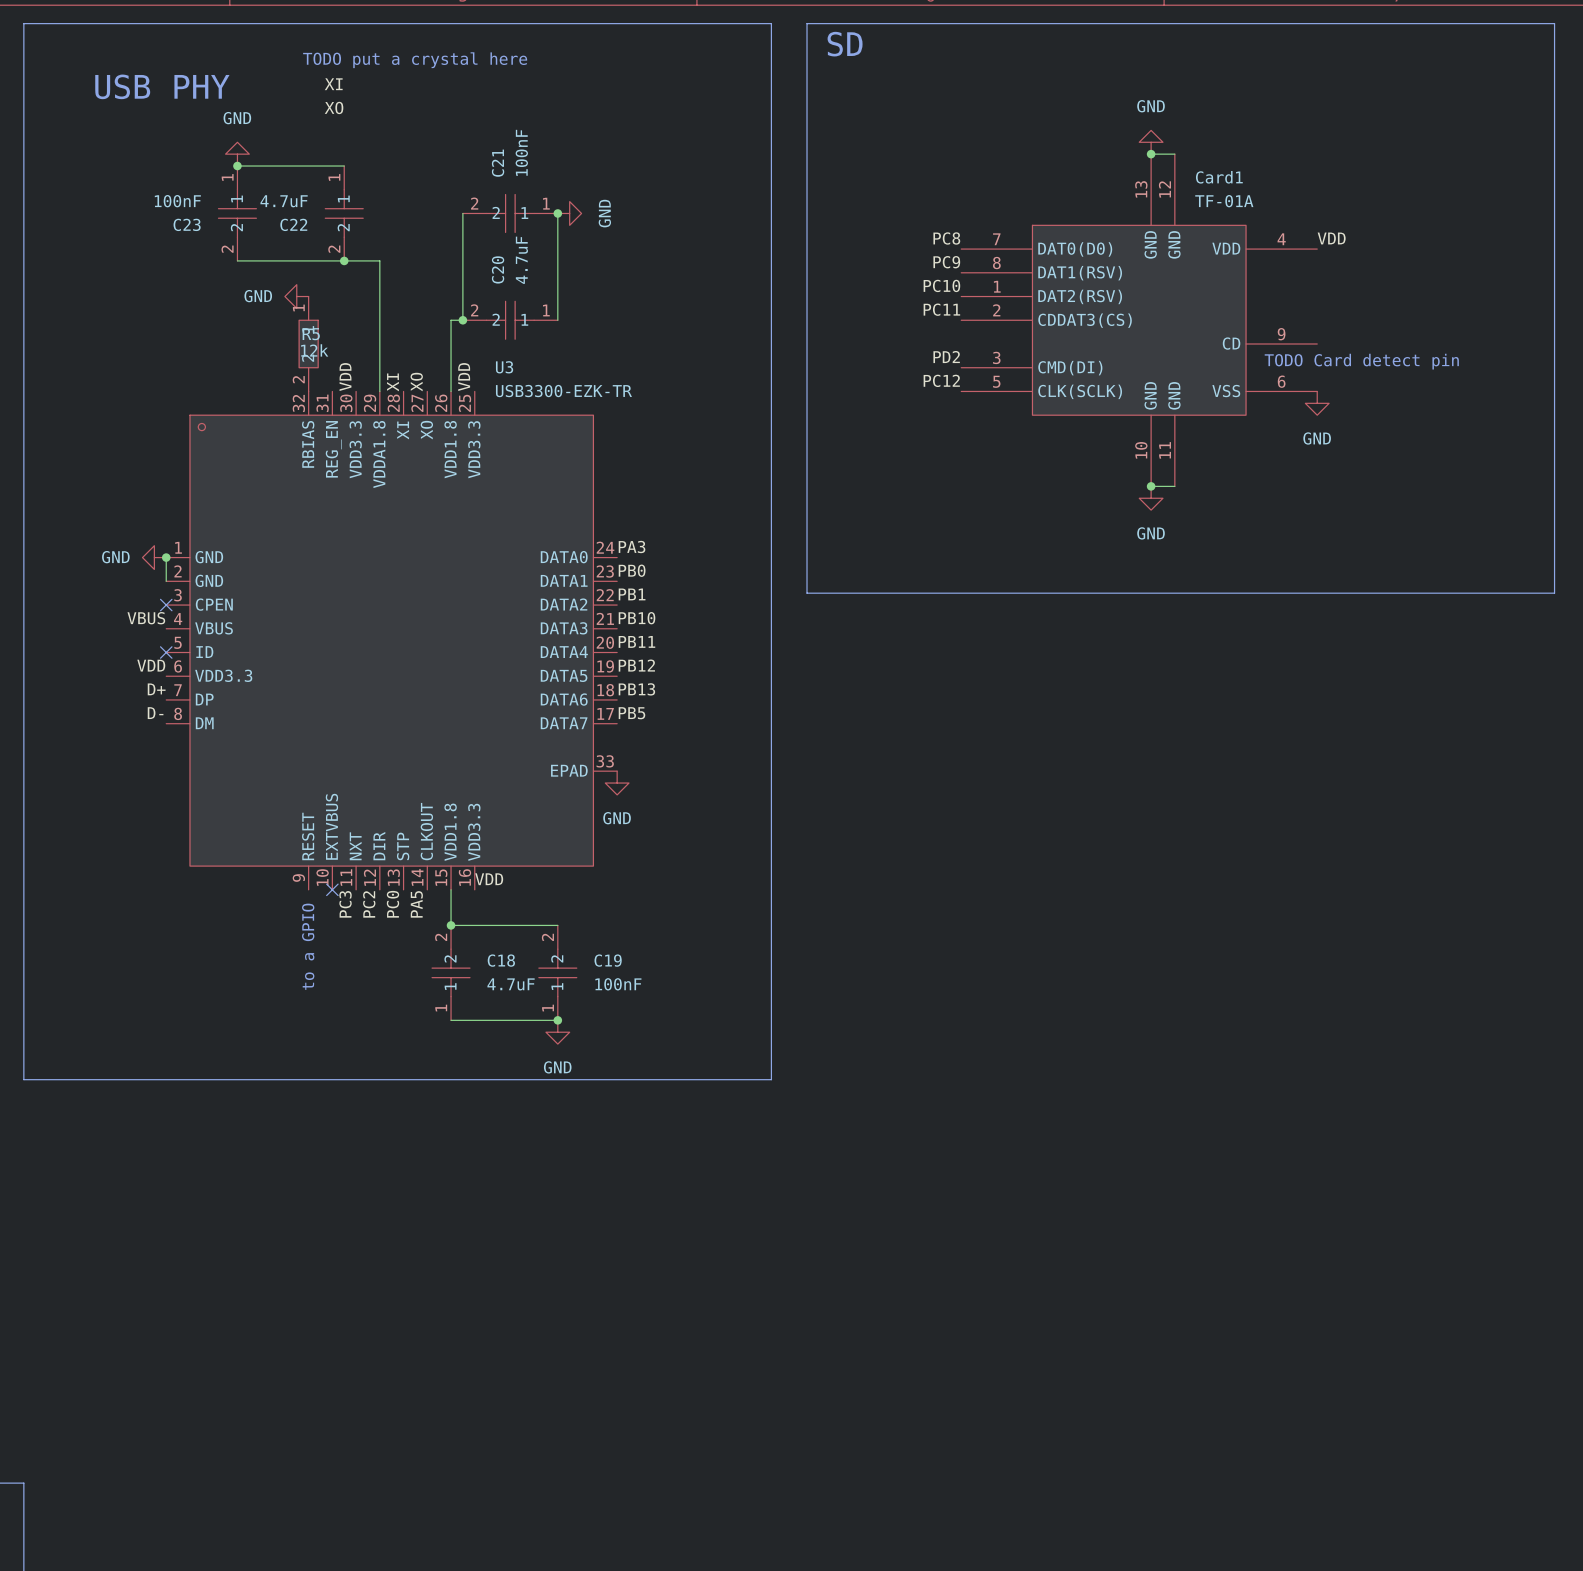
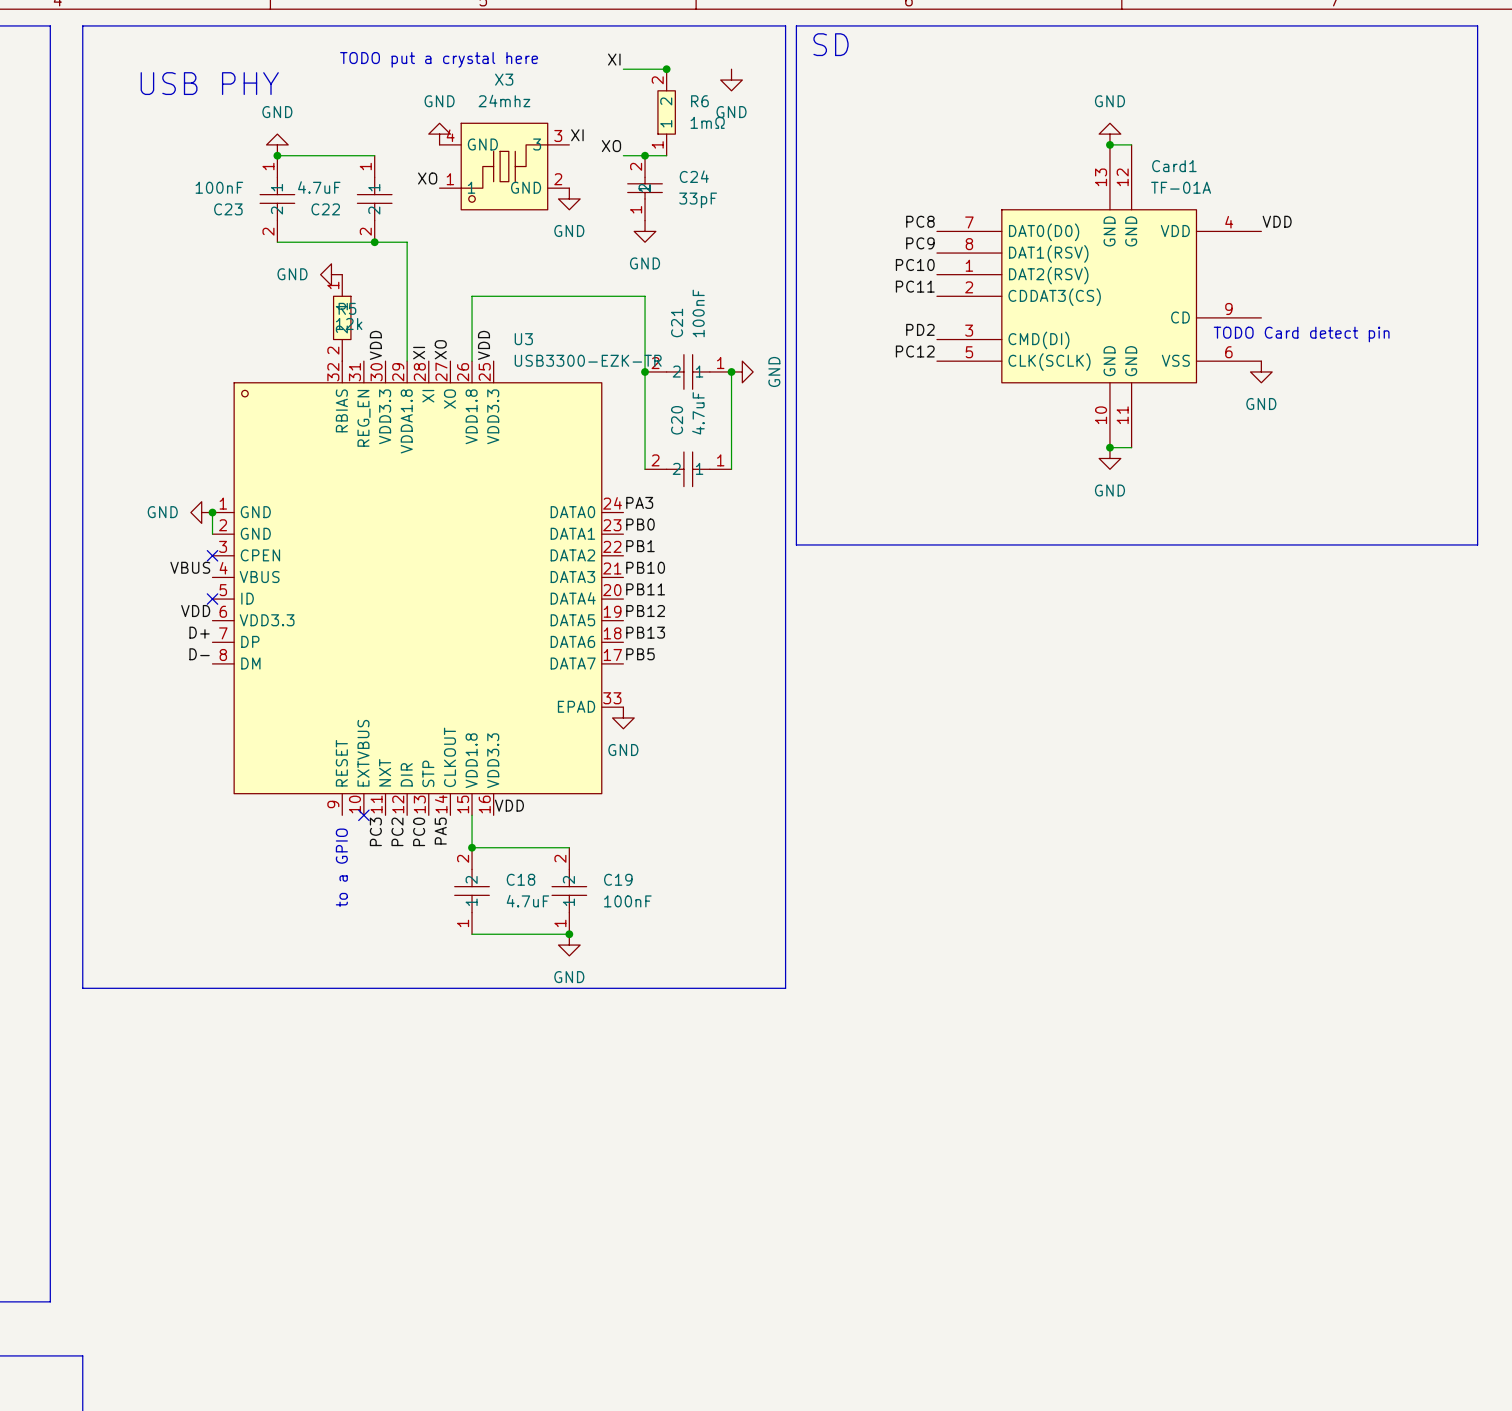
line: (771, 23) (771, 1079) -> (763, 25) (785, 25) (785, 988) (763, 988)
label: none -> XI (614, 59)
wire: none -> (623, 69) (666, 69)
junction: none -> (666, 69)
power symbol: none -> GND (731, 80)
label: XI (333, 84) -> none
label position: XO (334, 107) -> XO (427, 178)
R6: none -> 1mΩ (666, 112)
power symbol: none -> GND (439, 134)
label: none -> XI (577, 135)
label: none -> XO (611, 146)
wire: none -> (623, 155) (666, 155)
junction: none -> (645, 155)
X3: none -> 24mhz (504, 166)
C24: none -> 33pF (645, 188)
wire: (462, 213) (462, 320) -> (645, 469) (645, 296) (482, 296)
C21 position: (510, 213) -> (688, 371)
wire: (557, 213) (557, 320) -> none
junction: (557, 213) -> none
power symbol rotation: 0° (569, 213) -> 90° clockwise (569, 198)
power symbol: none -> GND (645, 231)
junction: (462, 320) -> none
C20 position: (510, 320) -> (688, 469)
junction: none -> (645, 371)
wire: none -> (731, 371) (731, 469)
junction: none -> (731, 371)
power symbol: none -> GND (742, 371)

